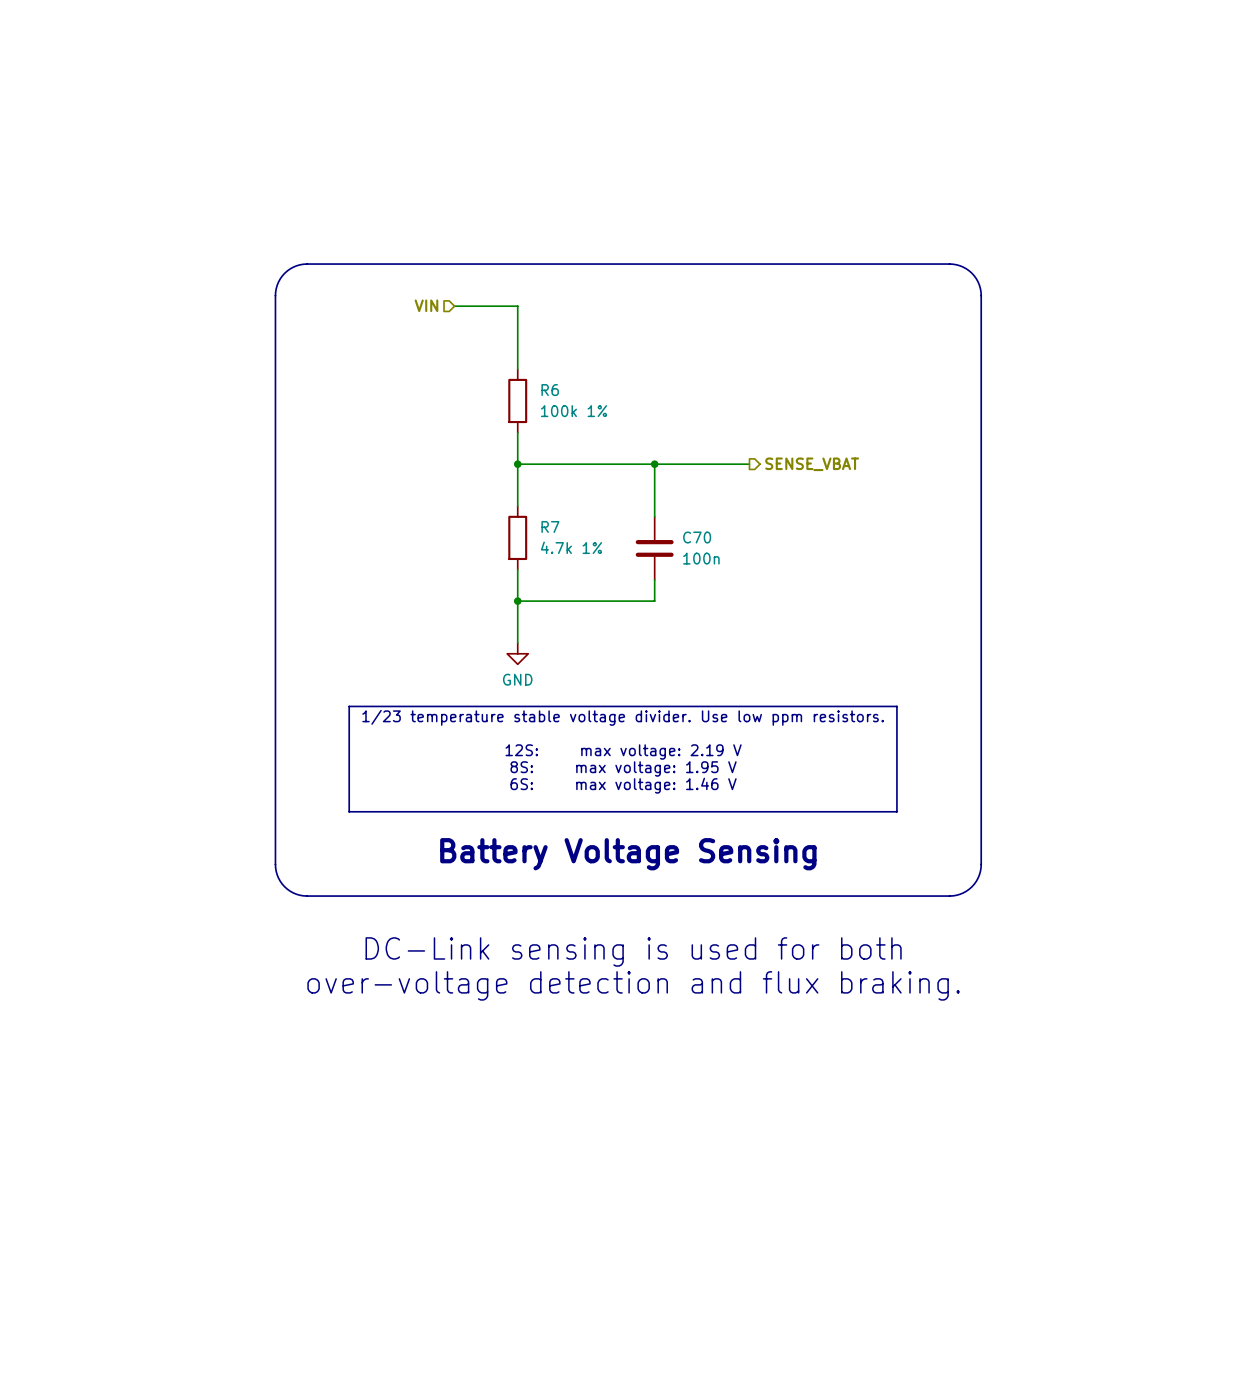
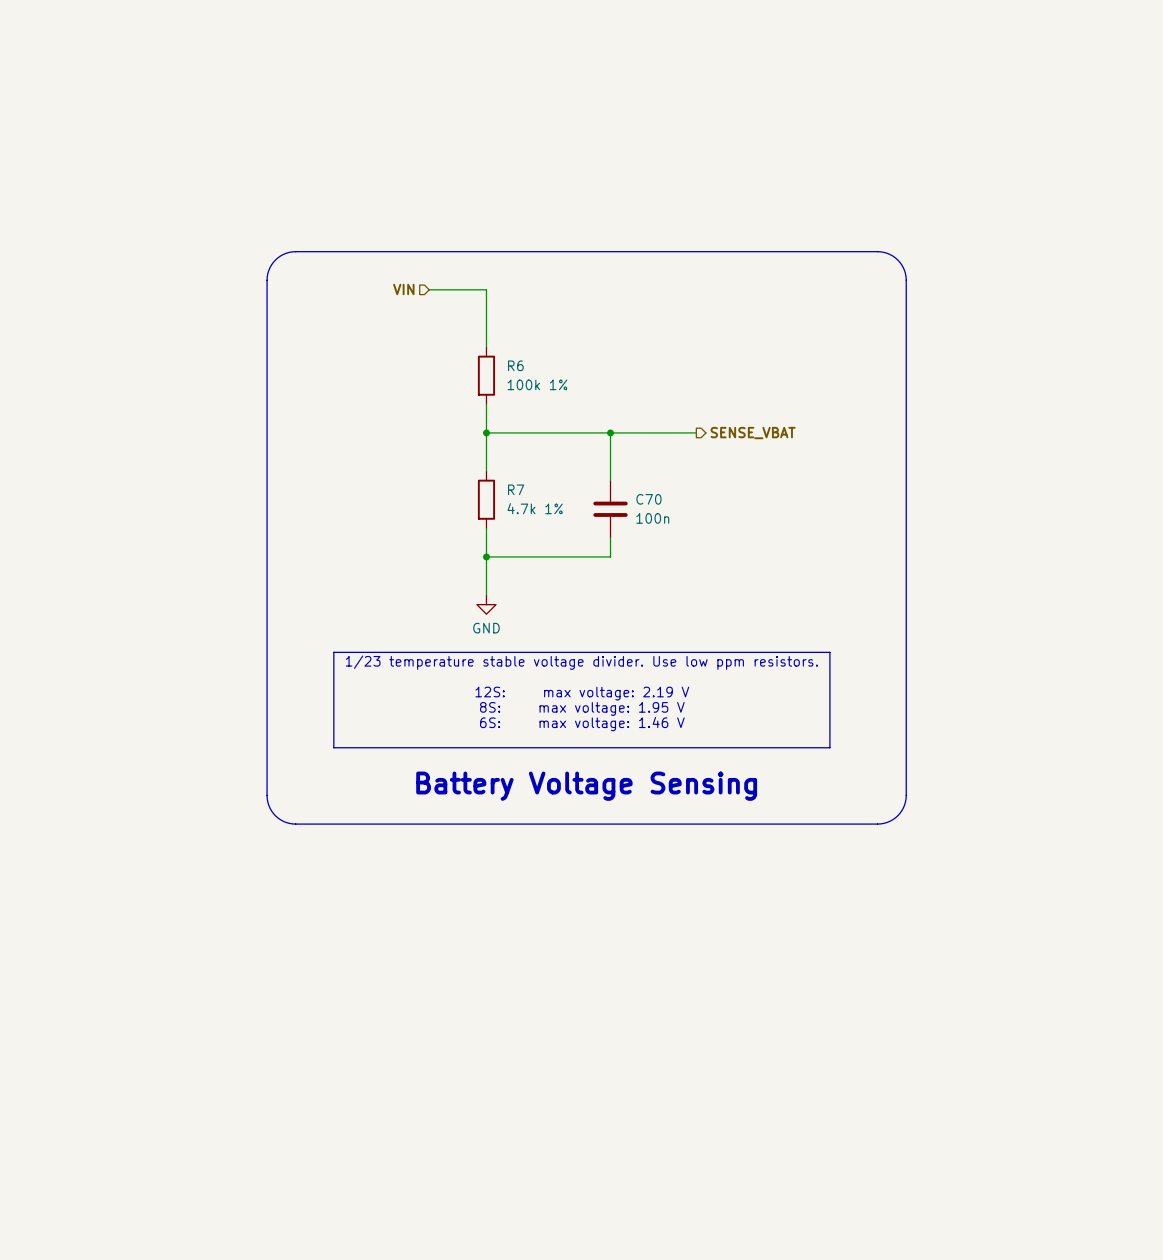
text: DC-Link sensing is used for both (633, 951) -> none
text: over-voltage detection and flux braking. (633, 985) -> none

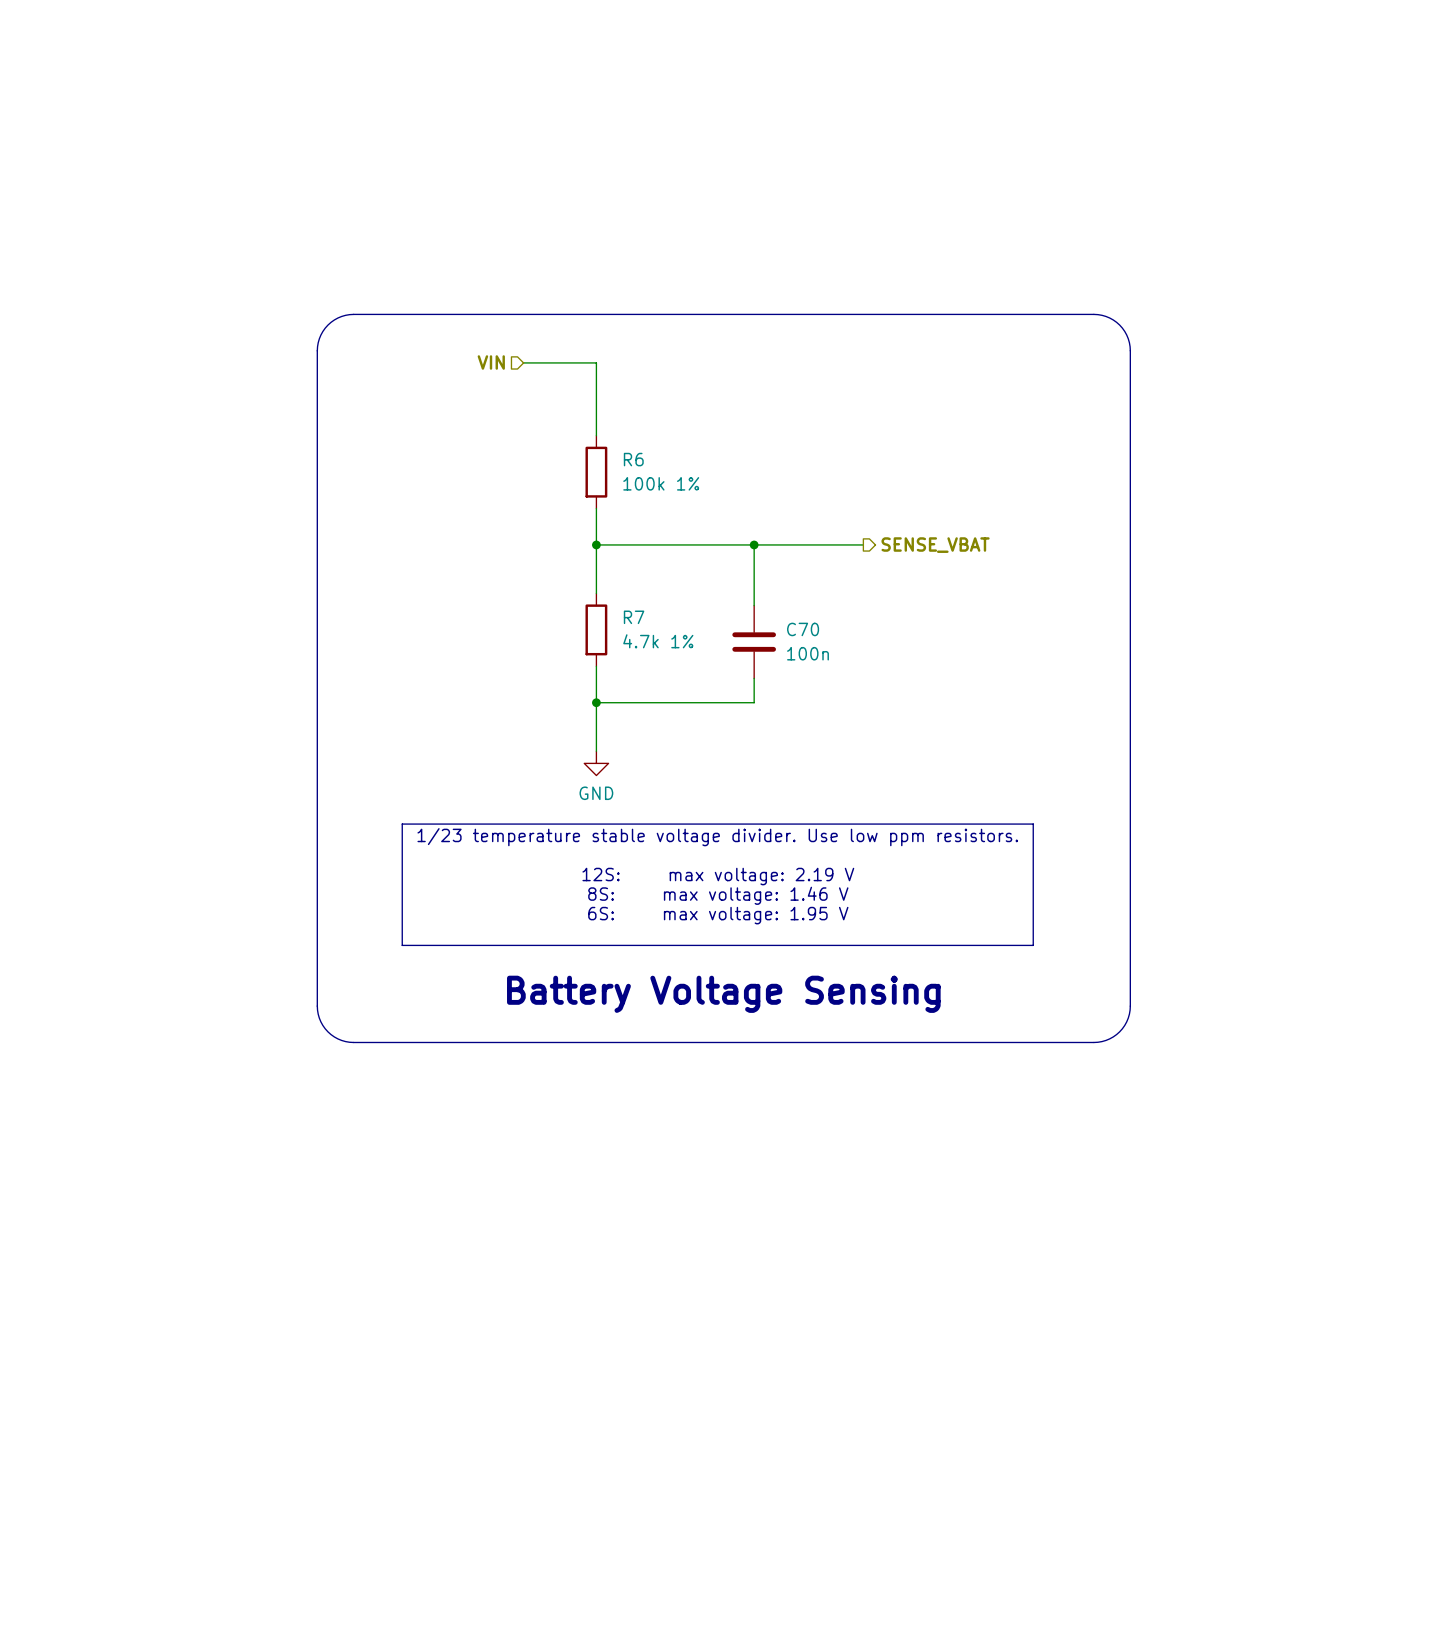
text: 8S: max voltage: 1.95 V (582, 708) -> 8S: max voltage: 1.46 V (718, 895)
text: 6S: max voltage: 1.46 V (582, 724) -> 6S: max voltage: 1.95 V (718, 915)

